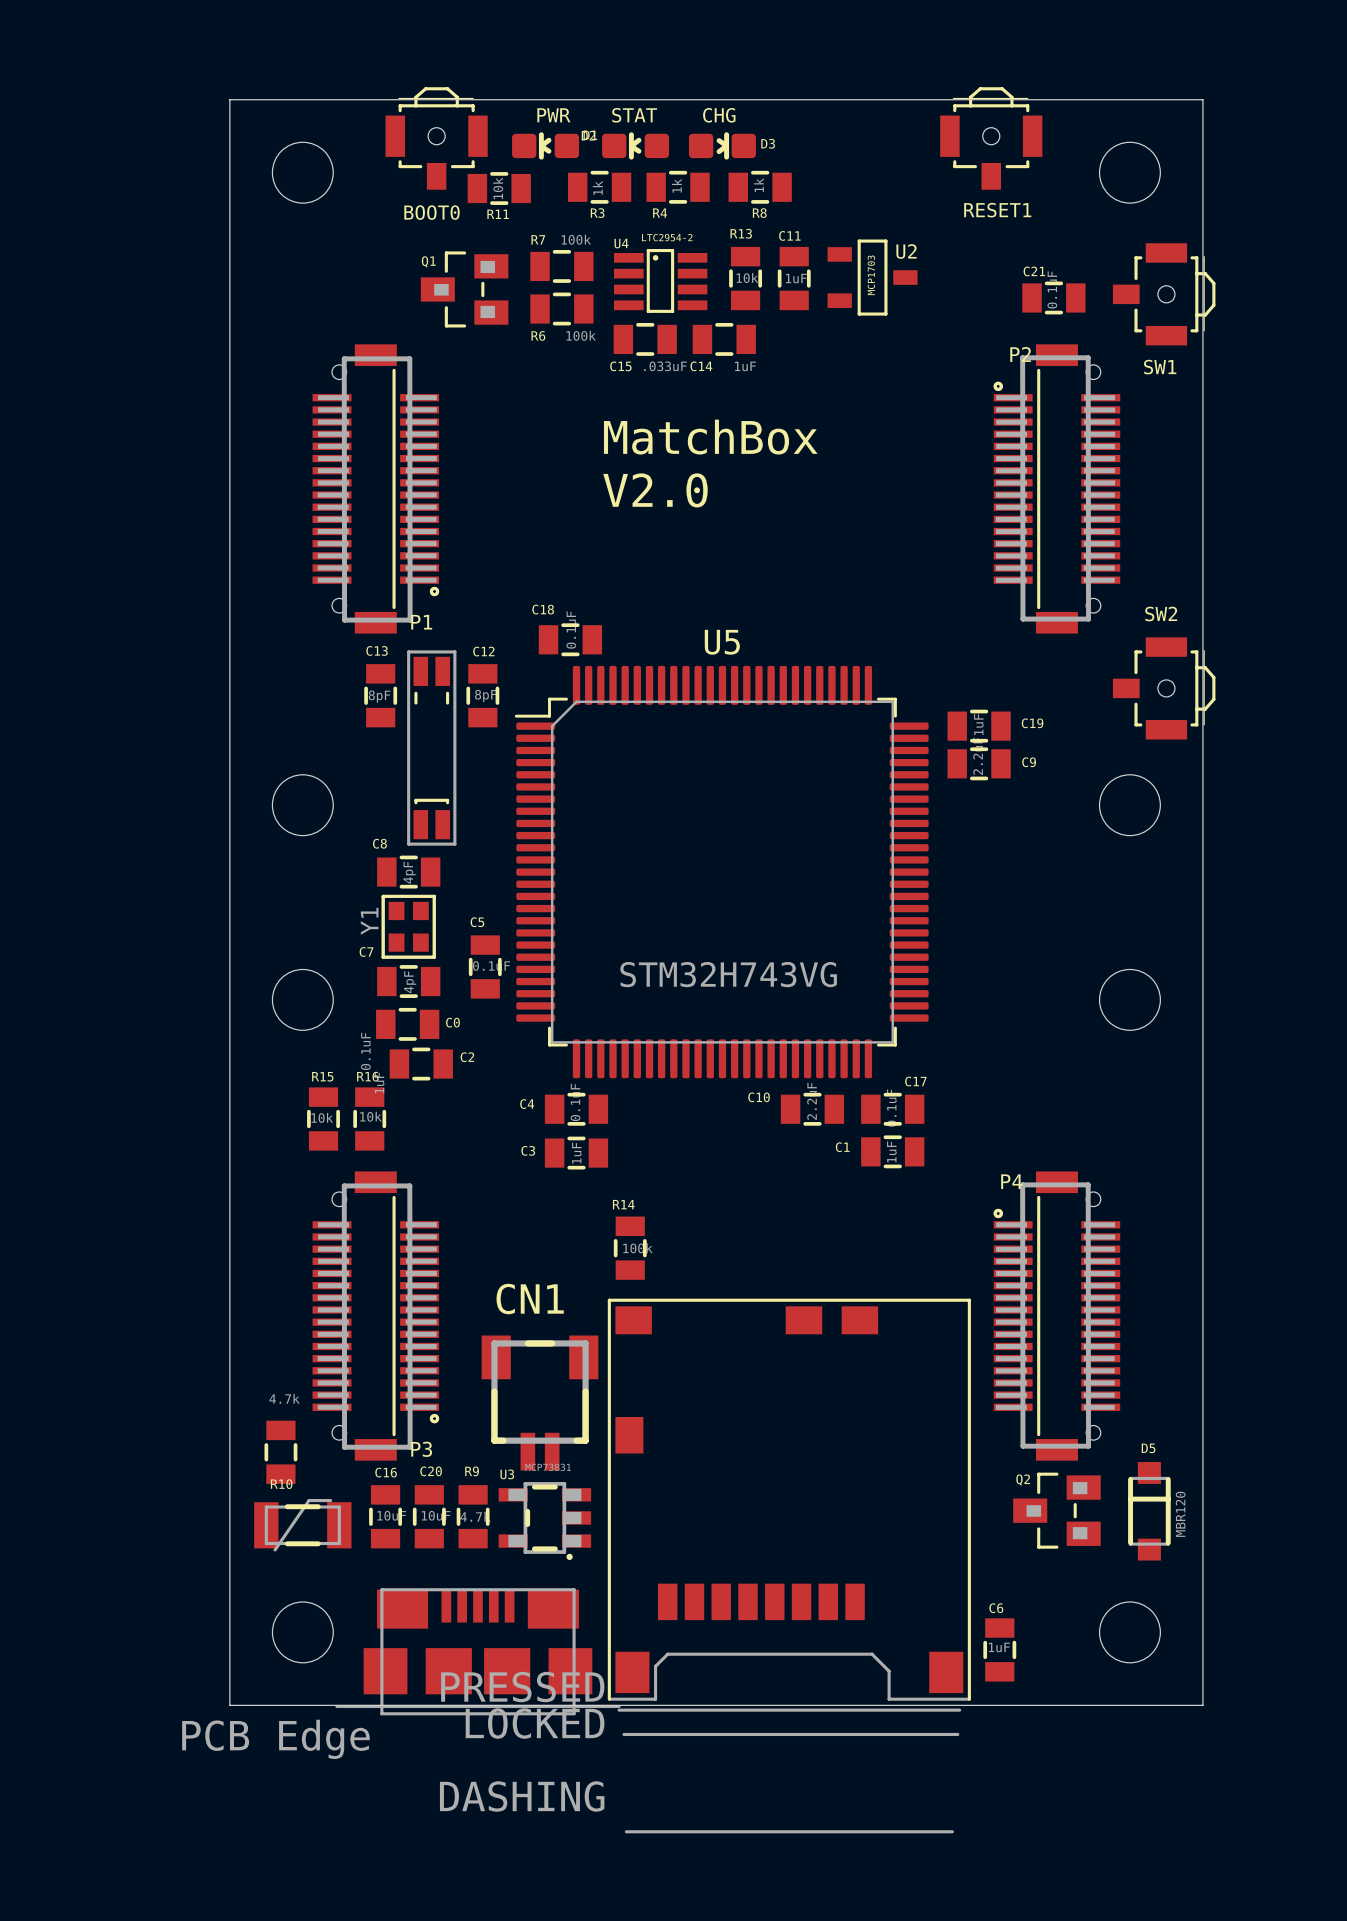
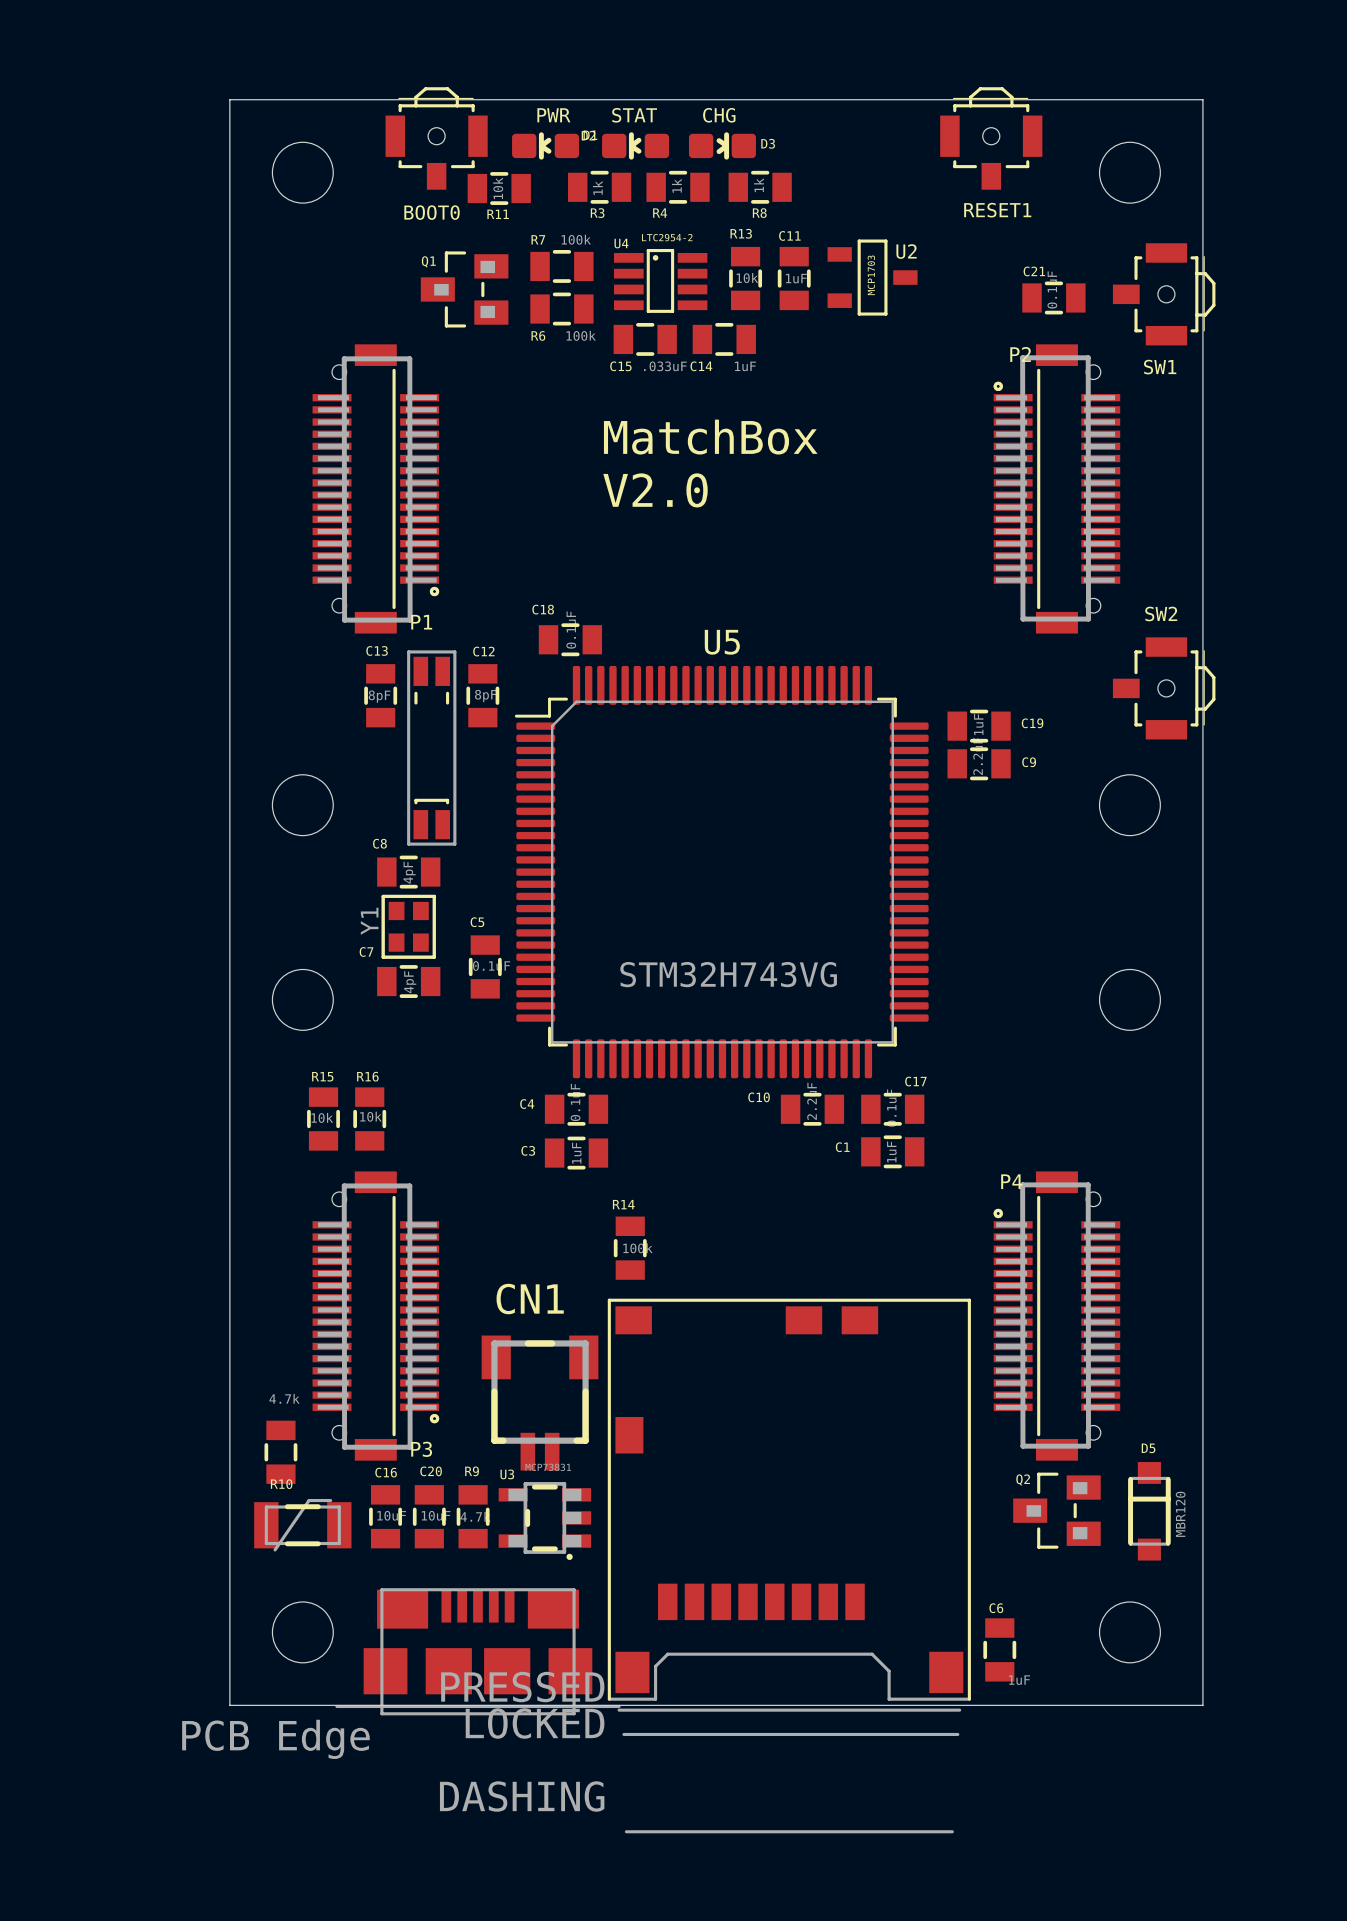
C0: 0.1uF (407, 1024) -> none
C2: 1uF (421, 1064) -> none
C6 value position: 1uF (999, 1647) -> 1uF (1019, 1680)

